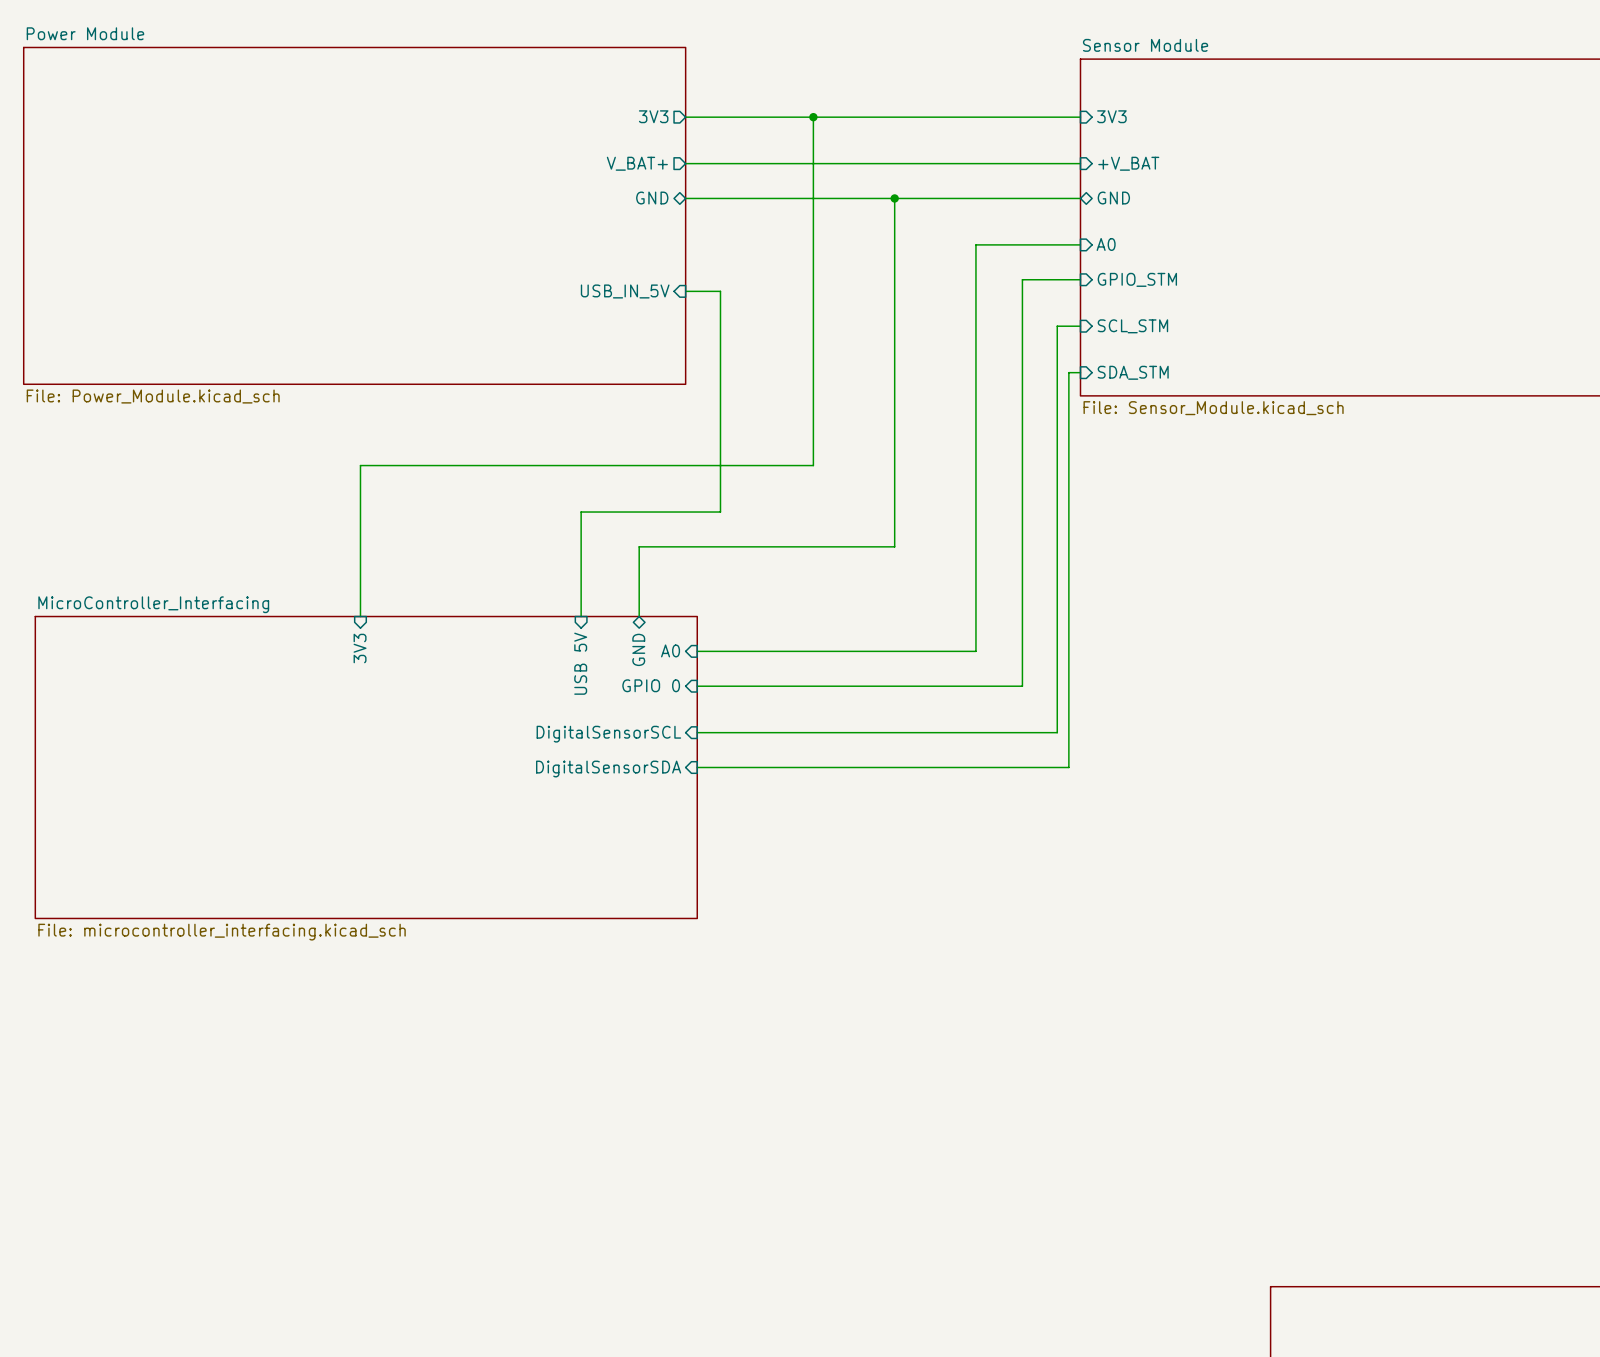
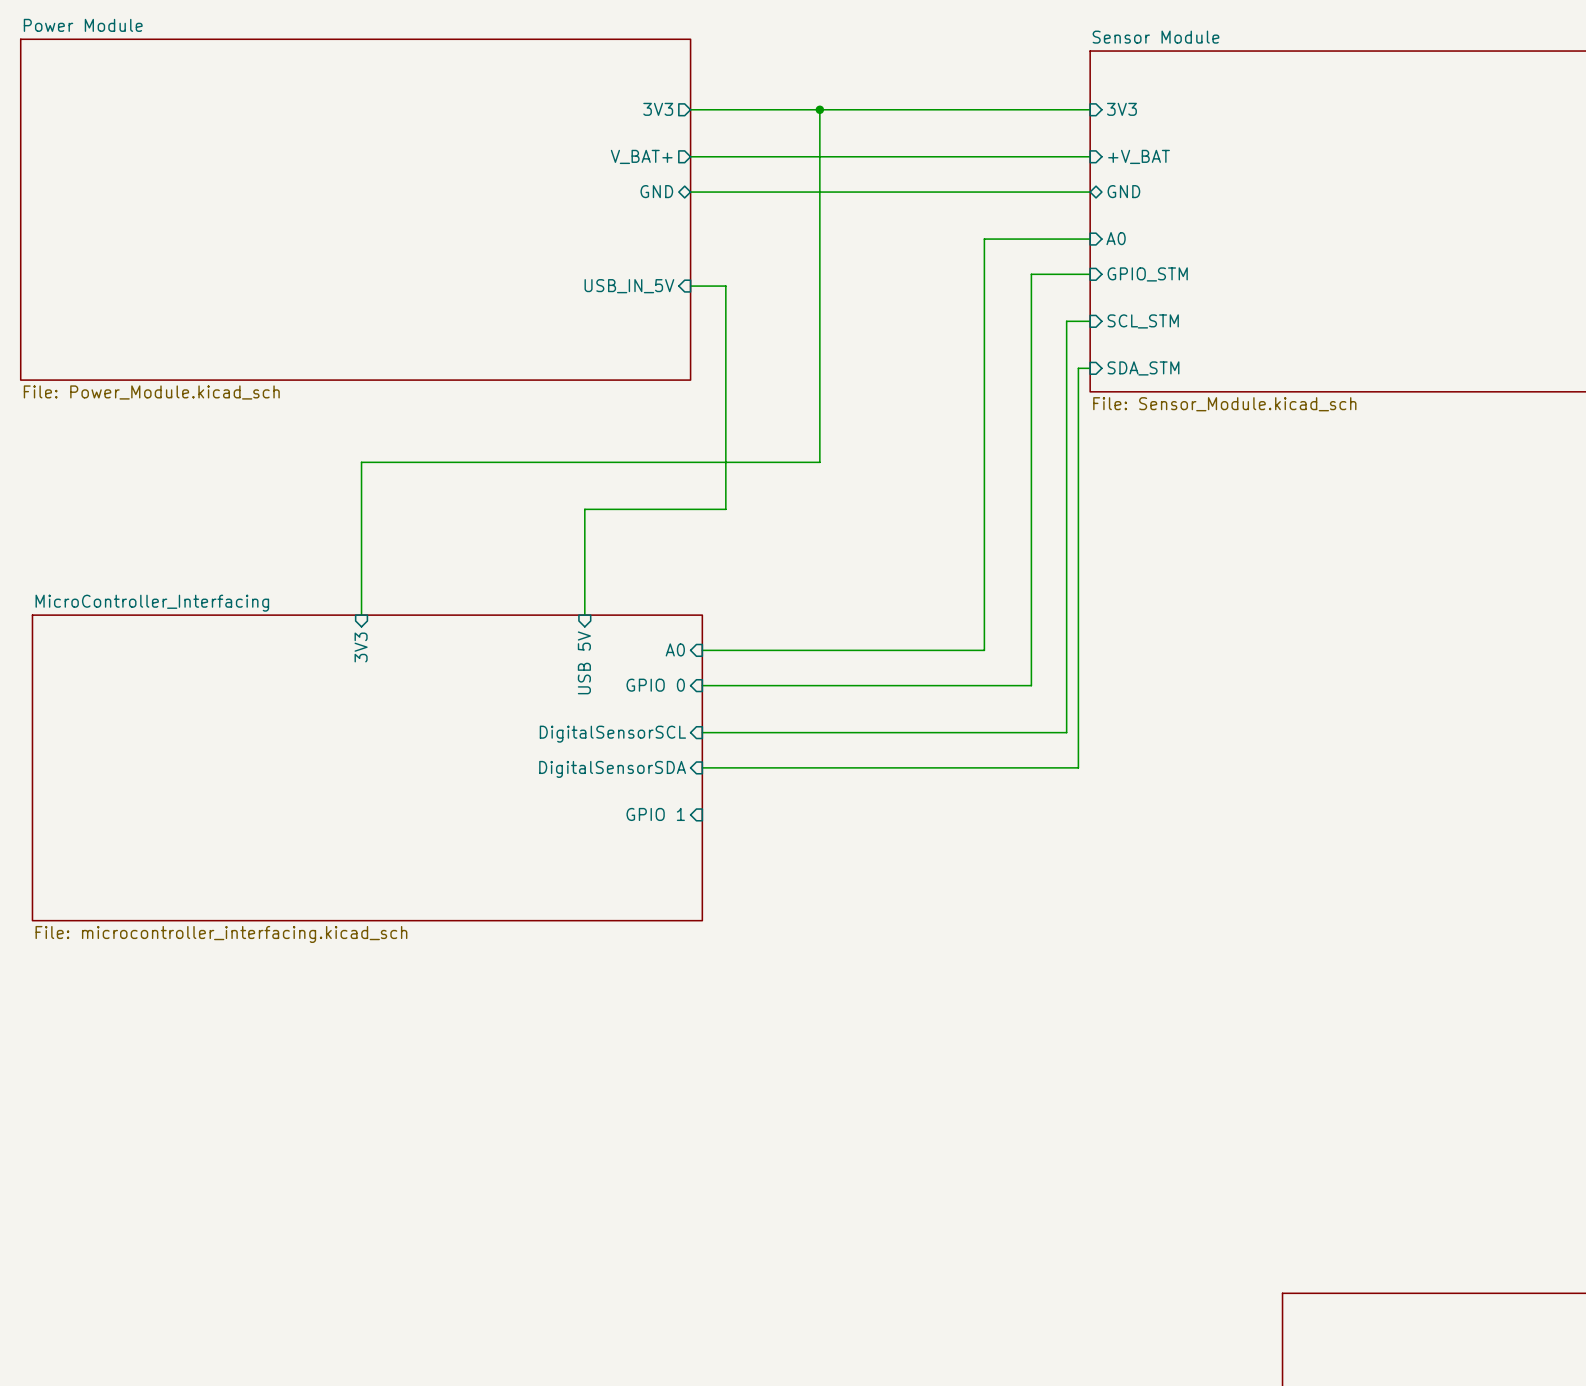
wire: (894, 198) (894, 546) (639, 546) (639, 616) -> none
junction: (894, 198) -> none
sheet pin: GND (638, 649) -> none
sheet pin: none -> GPIO 1 (655, 814)

